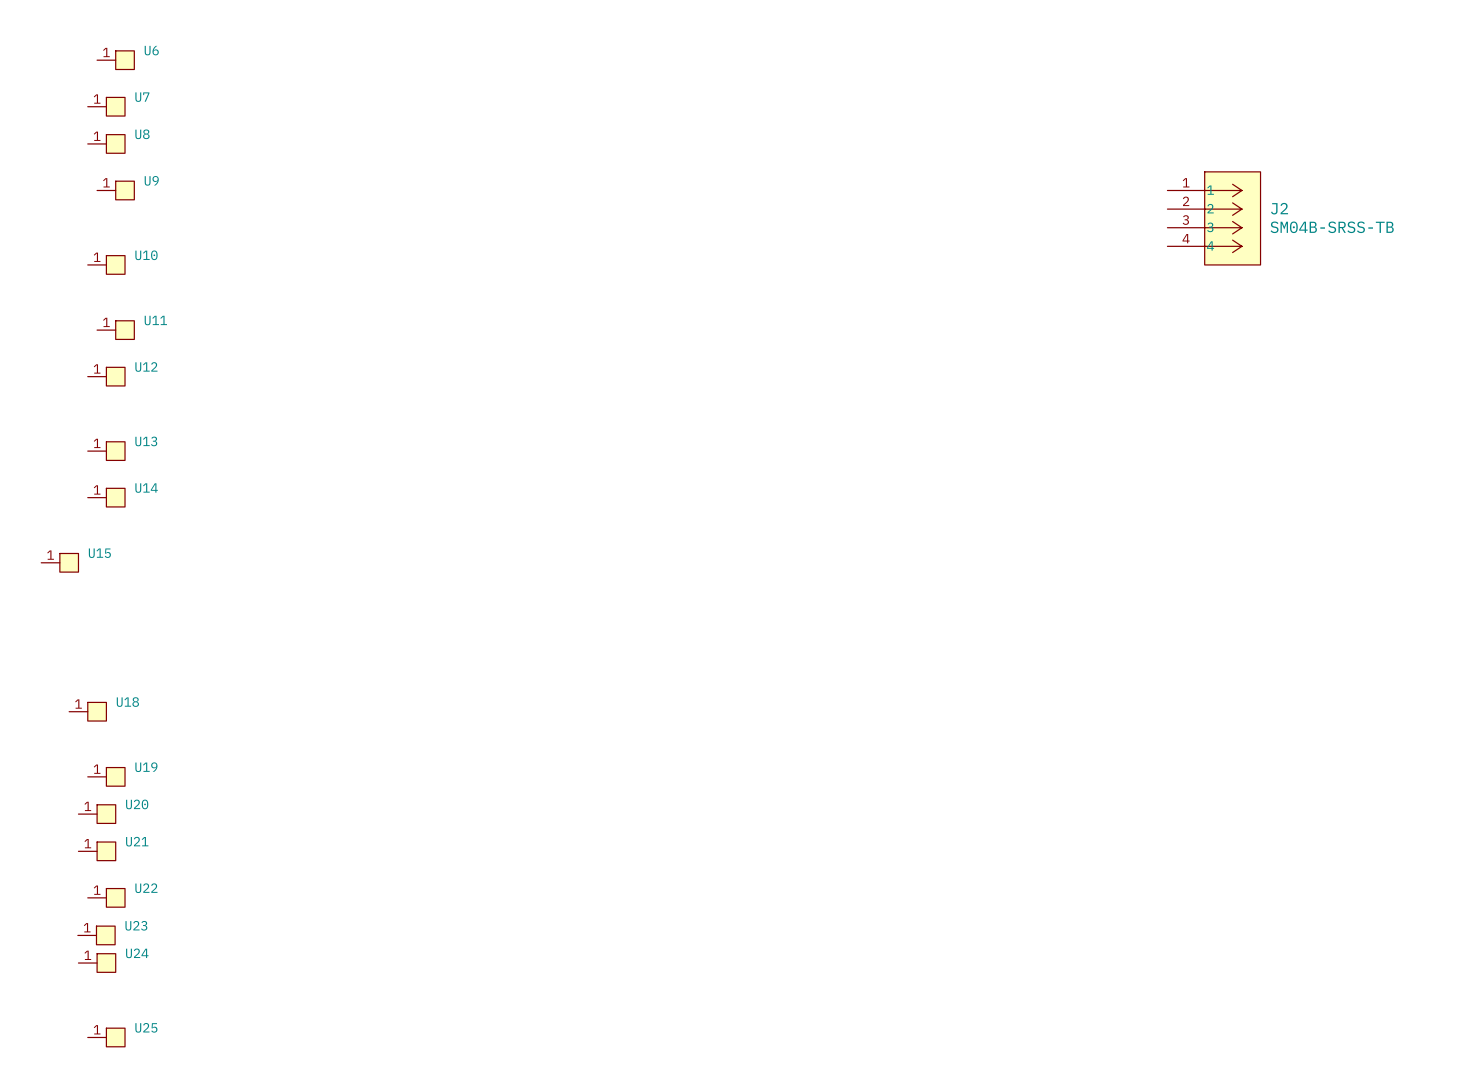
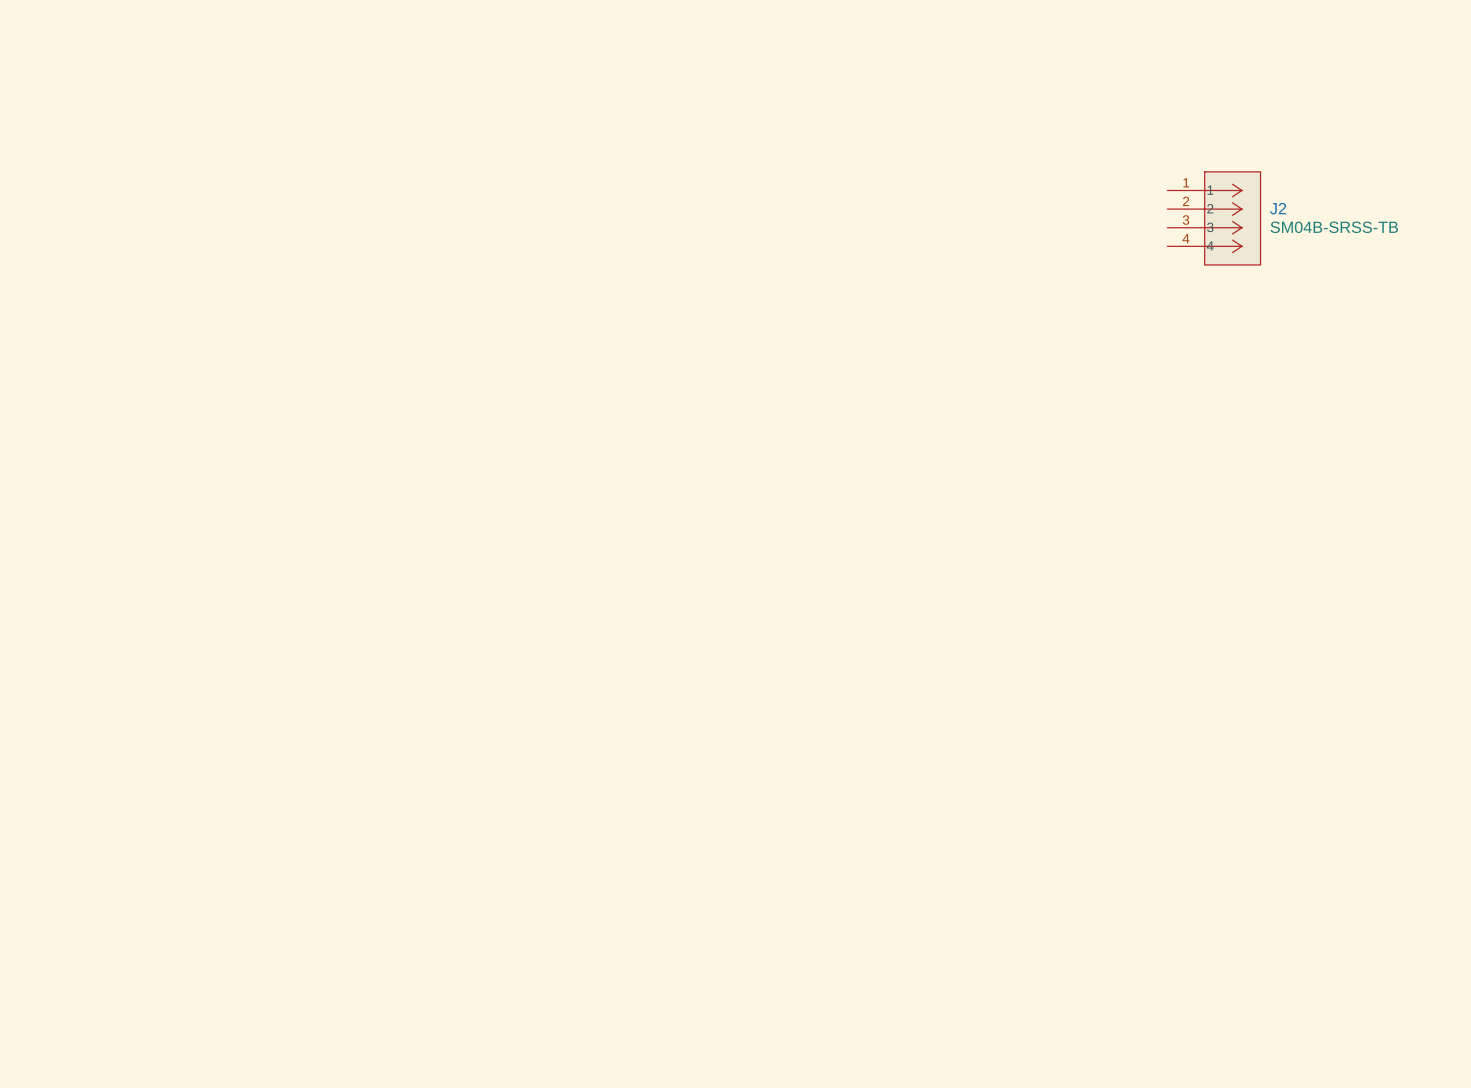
U6: (115, 60) -> none
U7: (106, 106) -> none
U8: (106, 143) -> none
U9: (115, 190) -> none
U10: (106, 264) -> none
U11: (115, 330) -> none
U12: (106, 376) -> none
U13: (106, 451) -> none
U14: (106, 497) -> none
U15: (59, 562) -> none
U18: (87, 711) -> none
U19: (106, 776) -> none
U20: (97, 814) -> none
U21: (97, 851) -> none
U22: (106, 897) -> none
U23: (96, 935) -> none
U24: (97, 963) -> none
U25: (106, 1037) -> none

